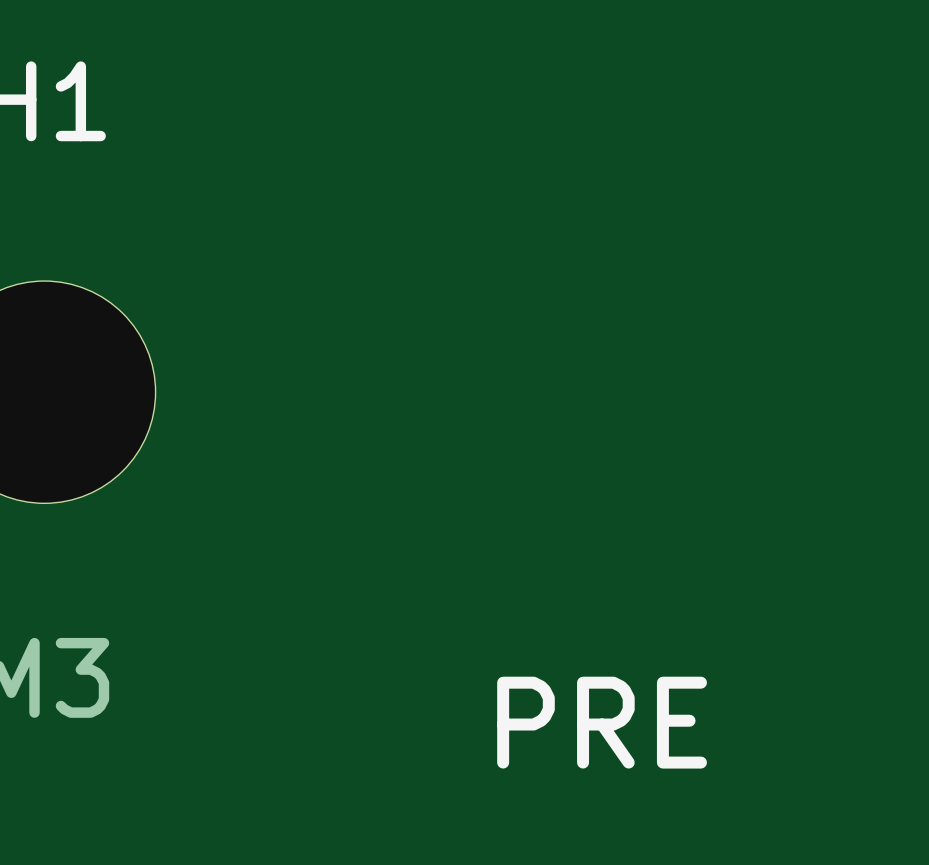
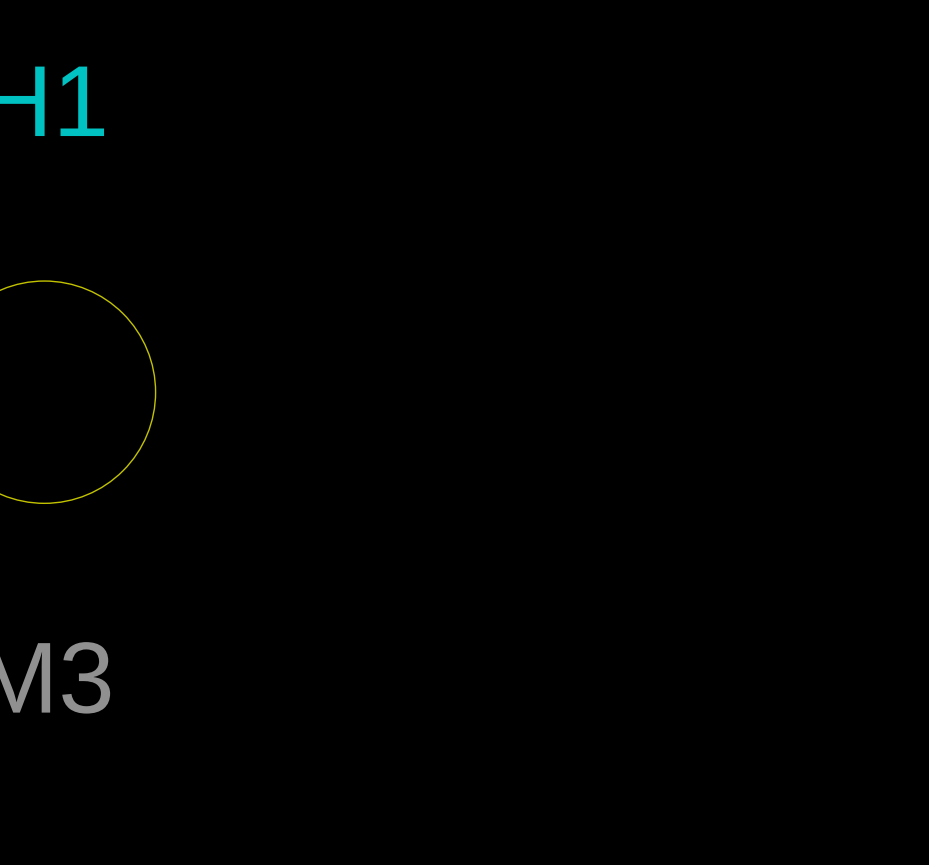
text: PRE (602, 722) -> none

